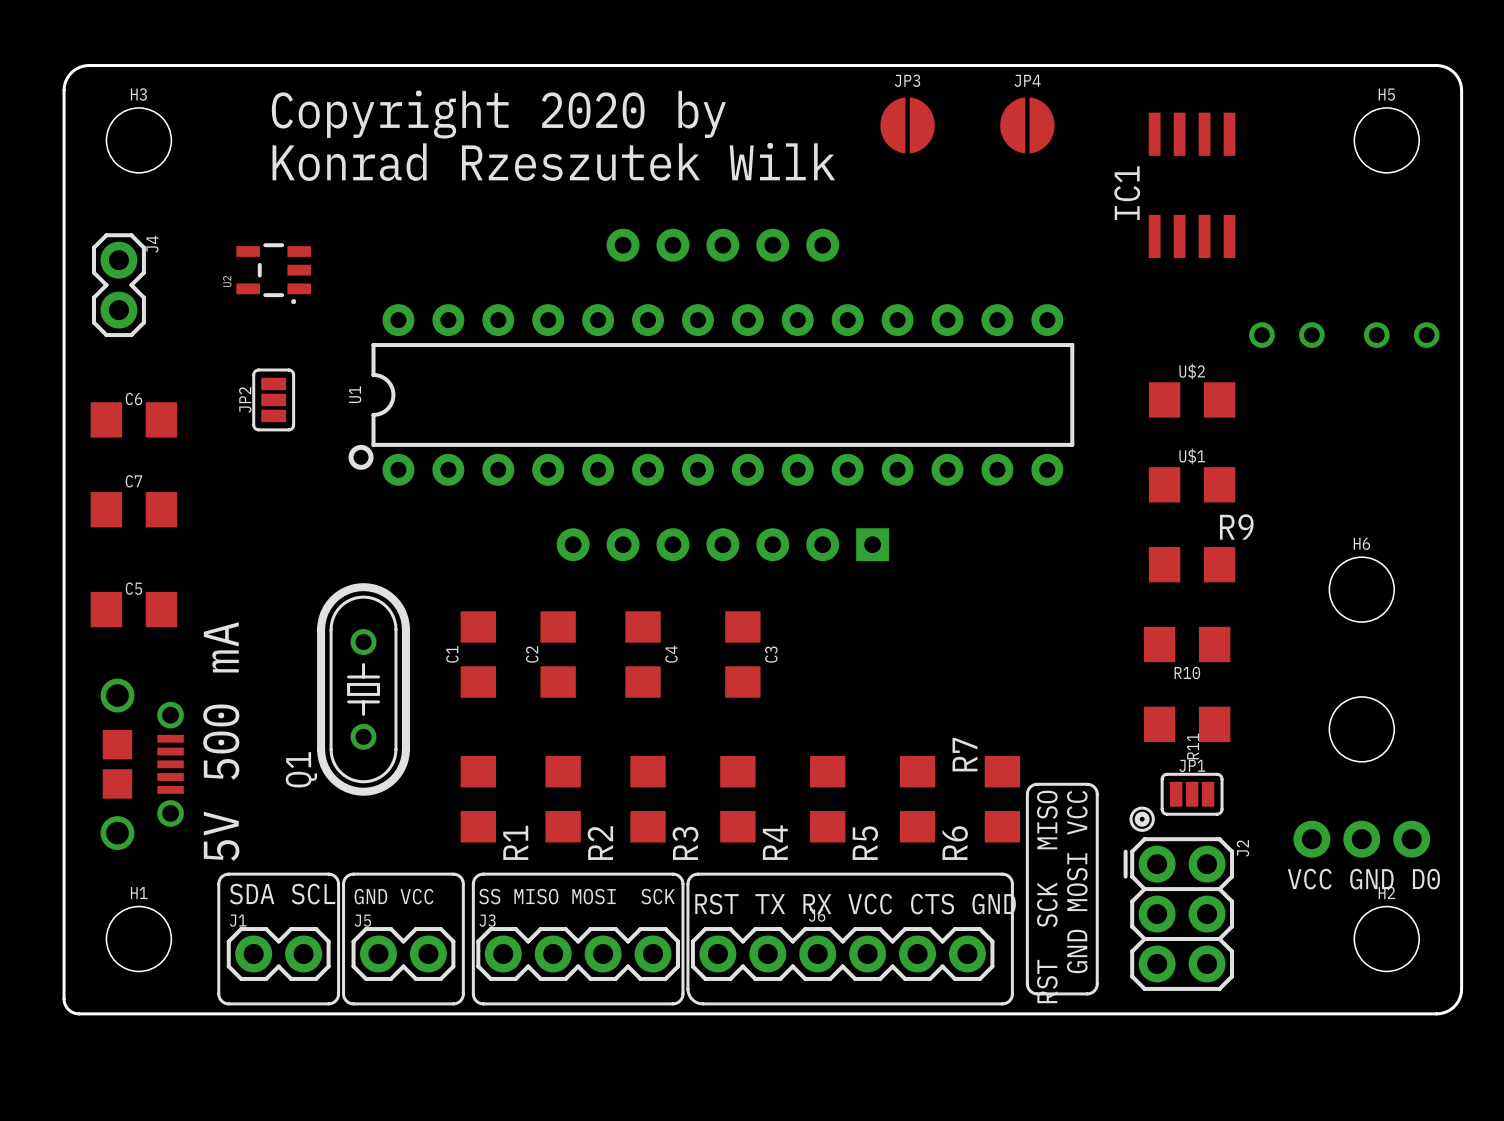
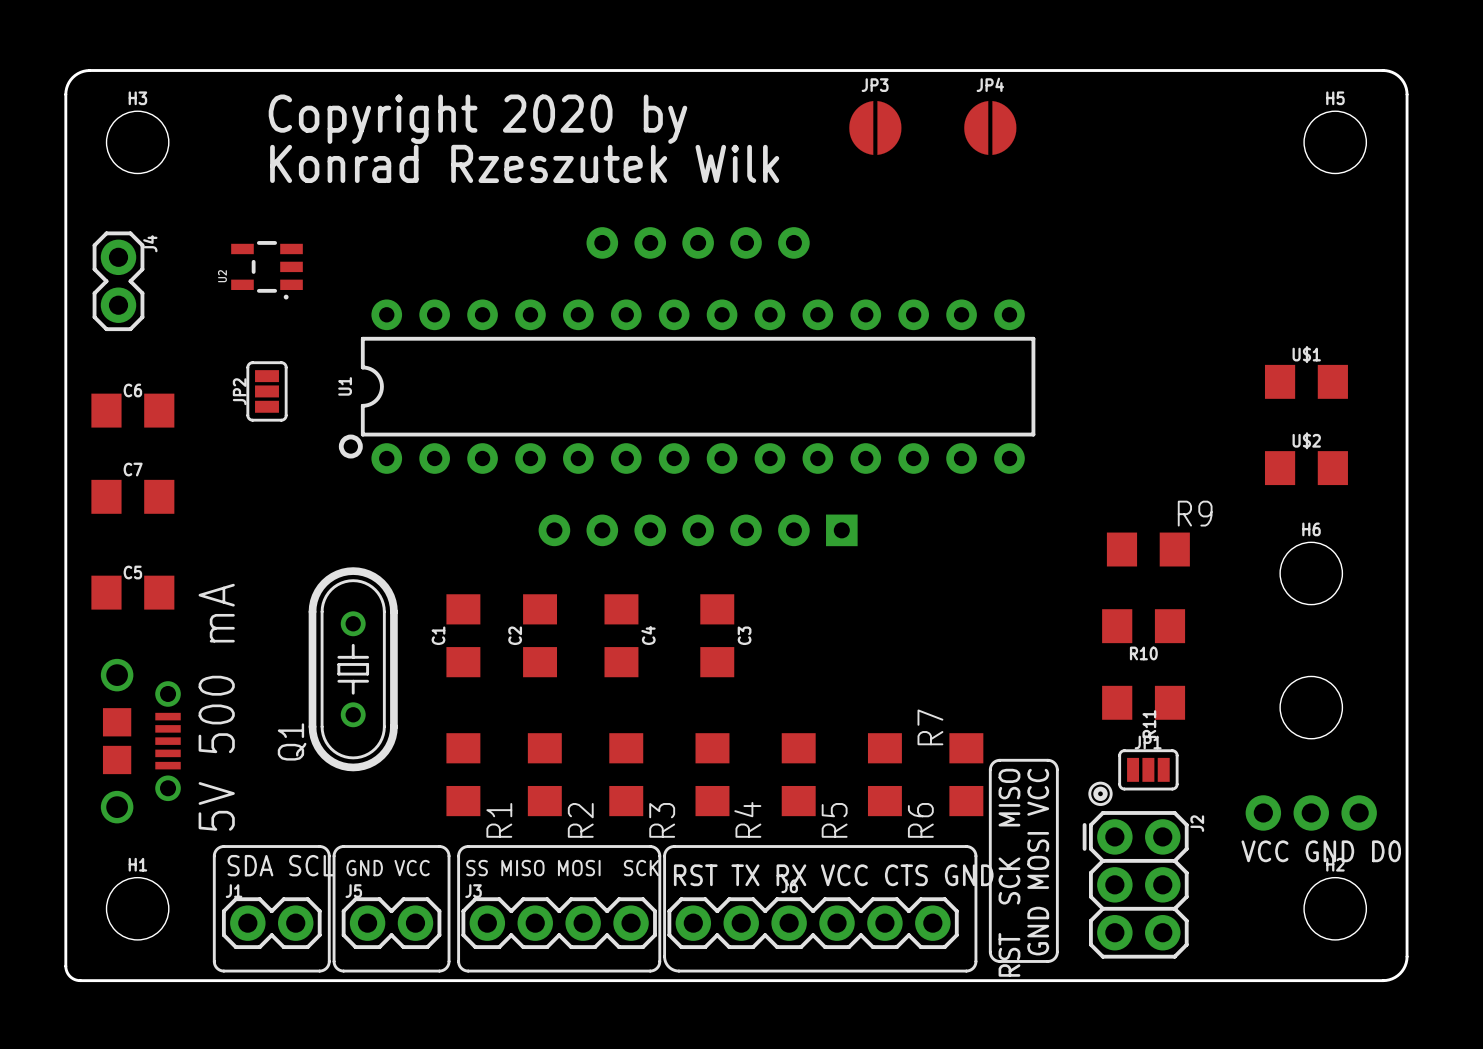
IC1: (1192, 185) -> none
part: (1286, 335) -> none
part: (1401, 335) -> none
U$2 position: (1192, 399) -> (1306, 468)
U$1 position: (1192, 484) -> (1306, 381)

